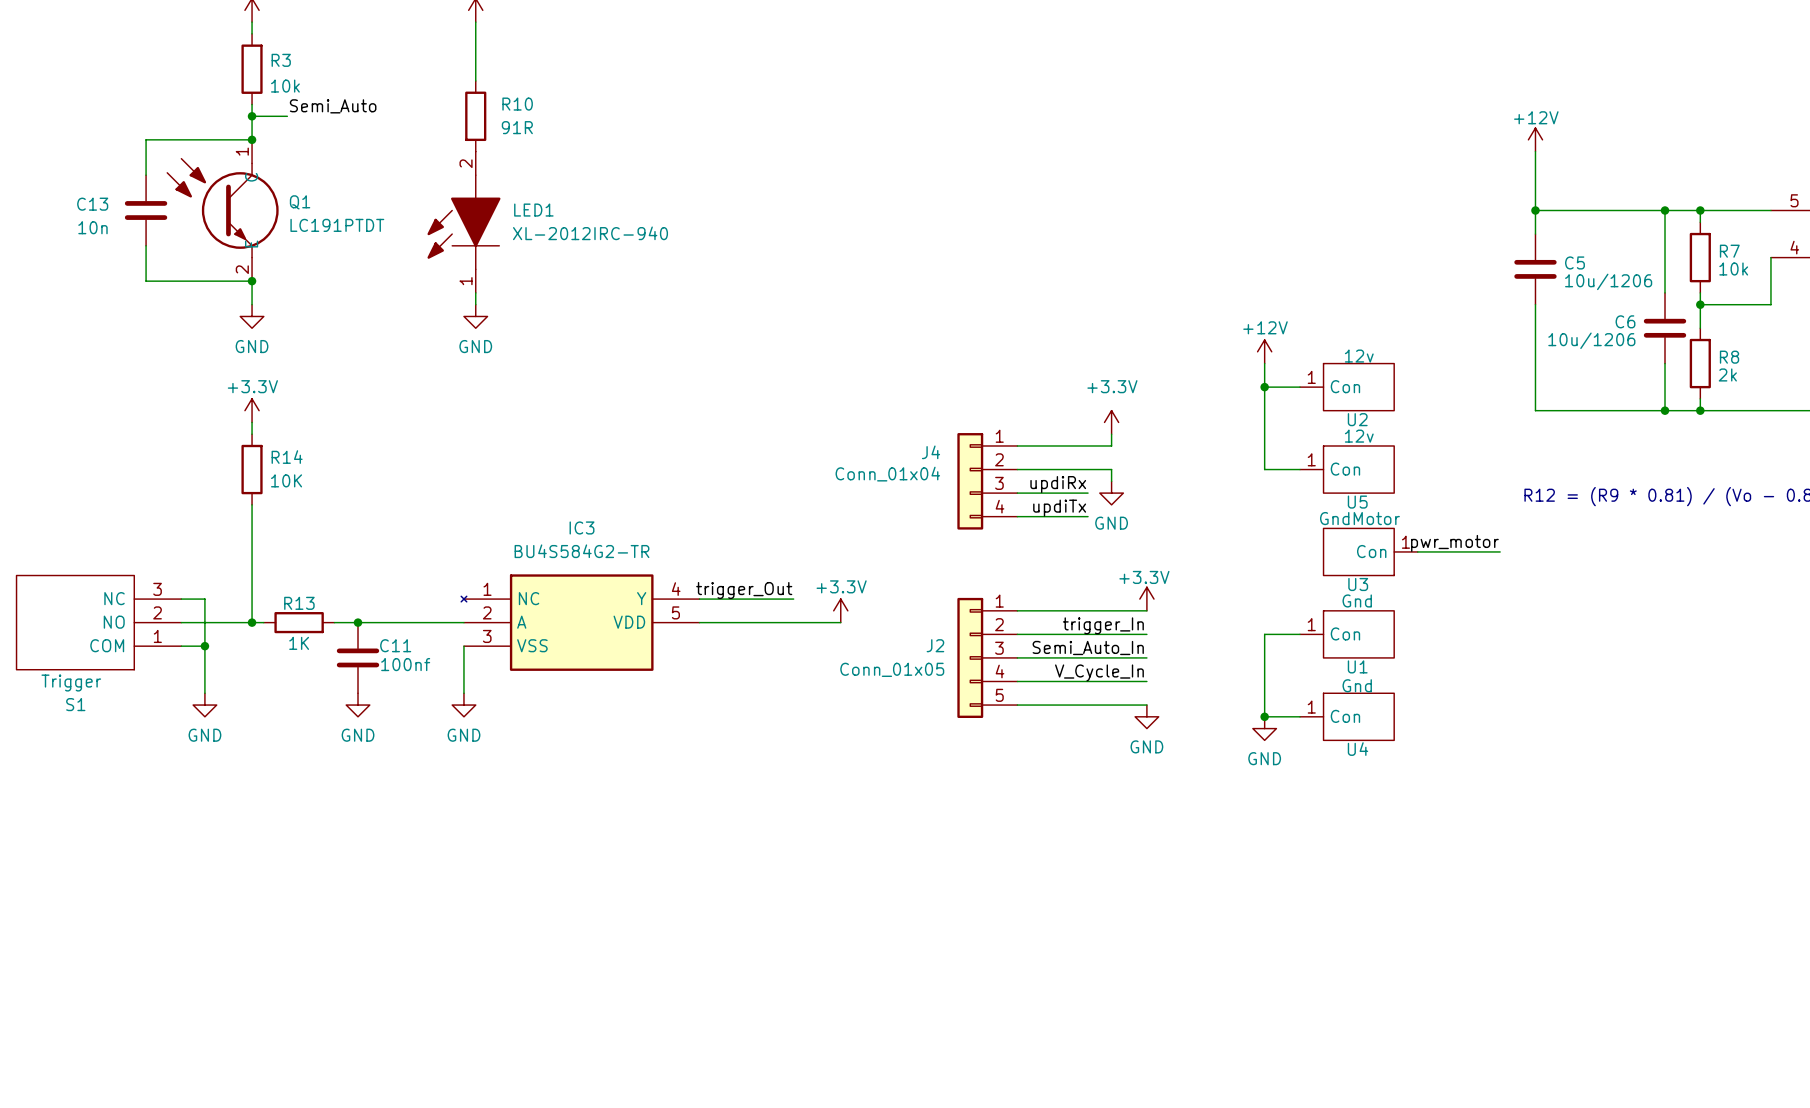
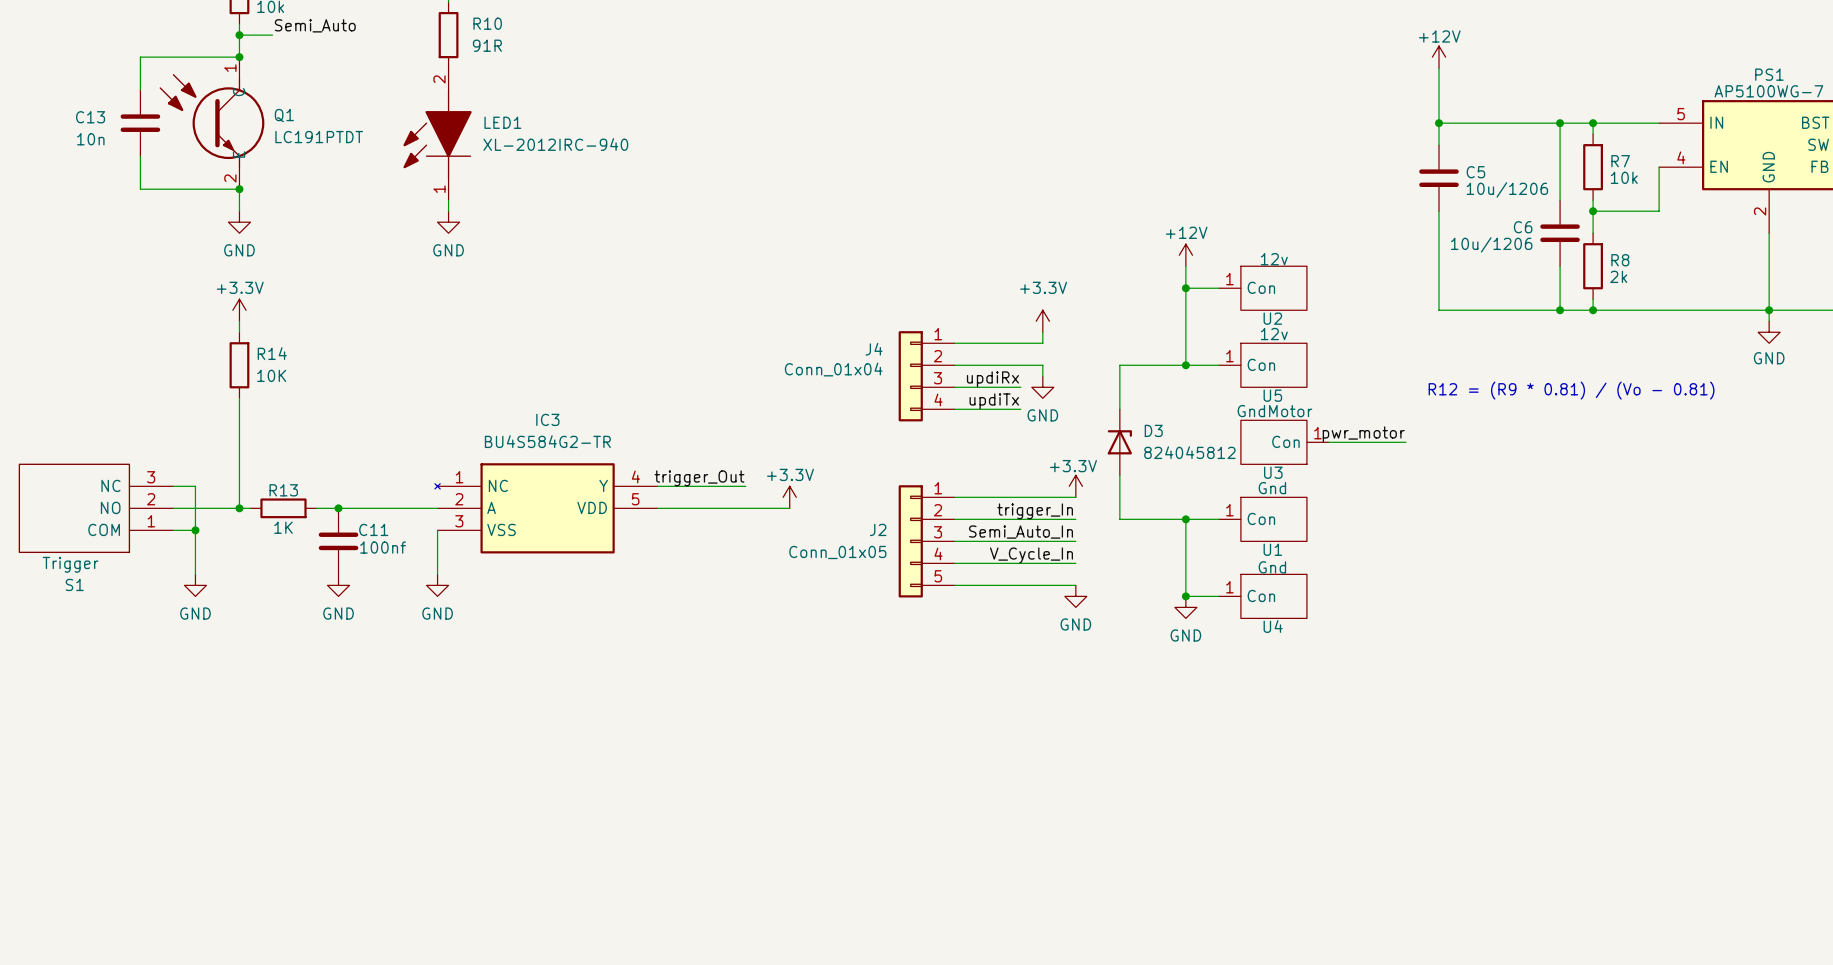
wire: none -> (1185, 365) (1119, 365) (1119, 409)
junction: none -> (1185, 365)
D3: none -> 824045812 (1119, 442)
wire: none -> (1119, 475) (1119, 519) (1185, 519)
junction: none -> (1185, 519)

